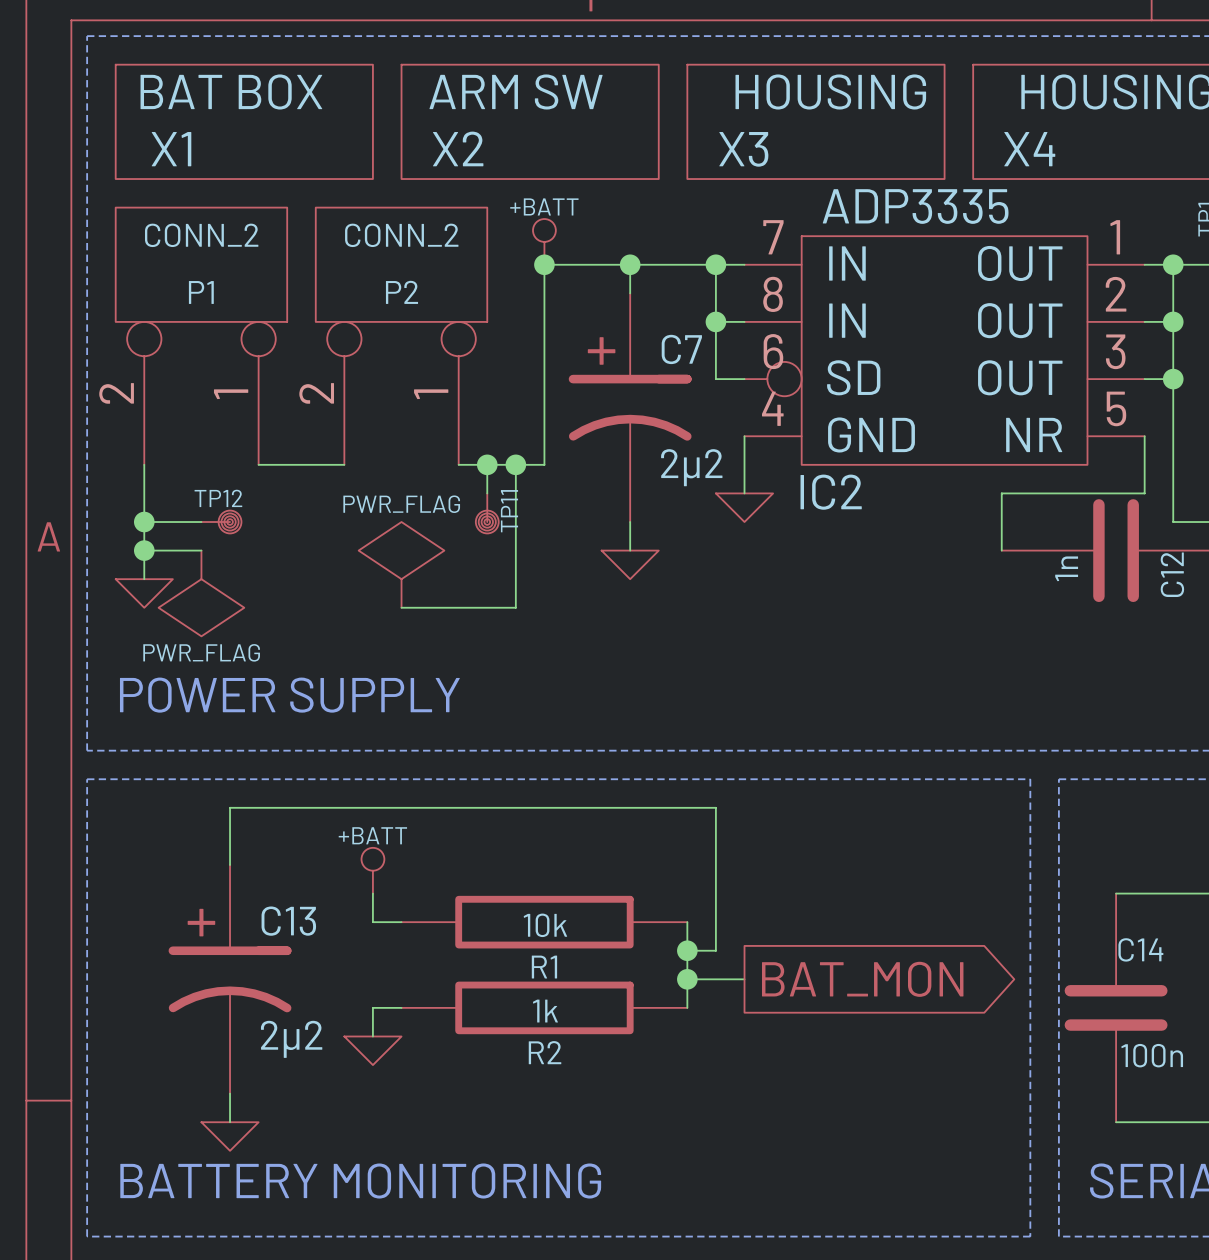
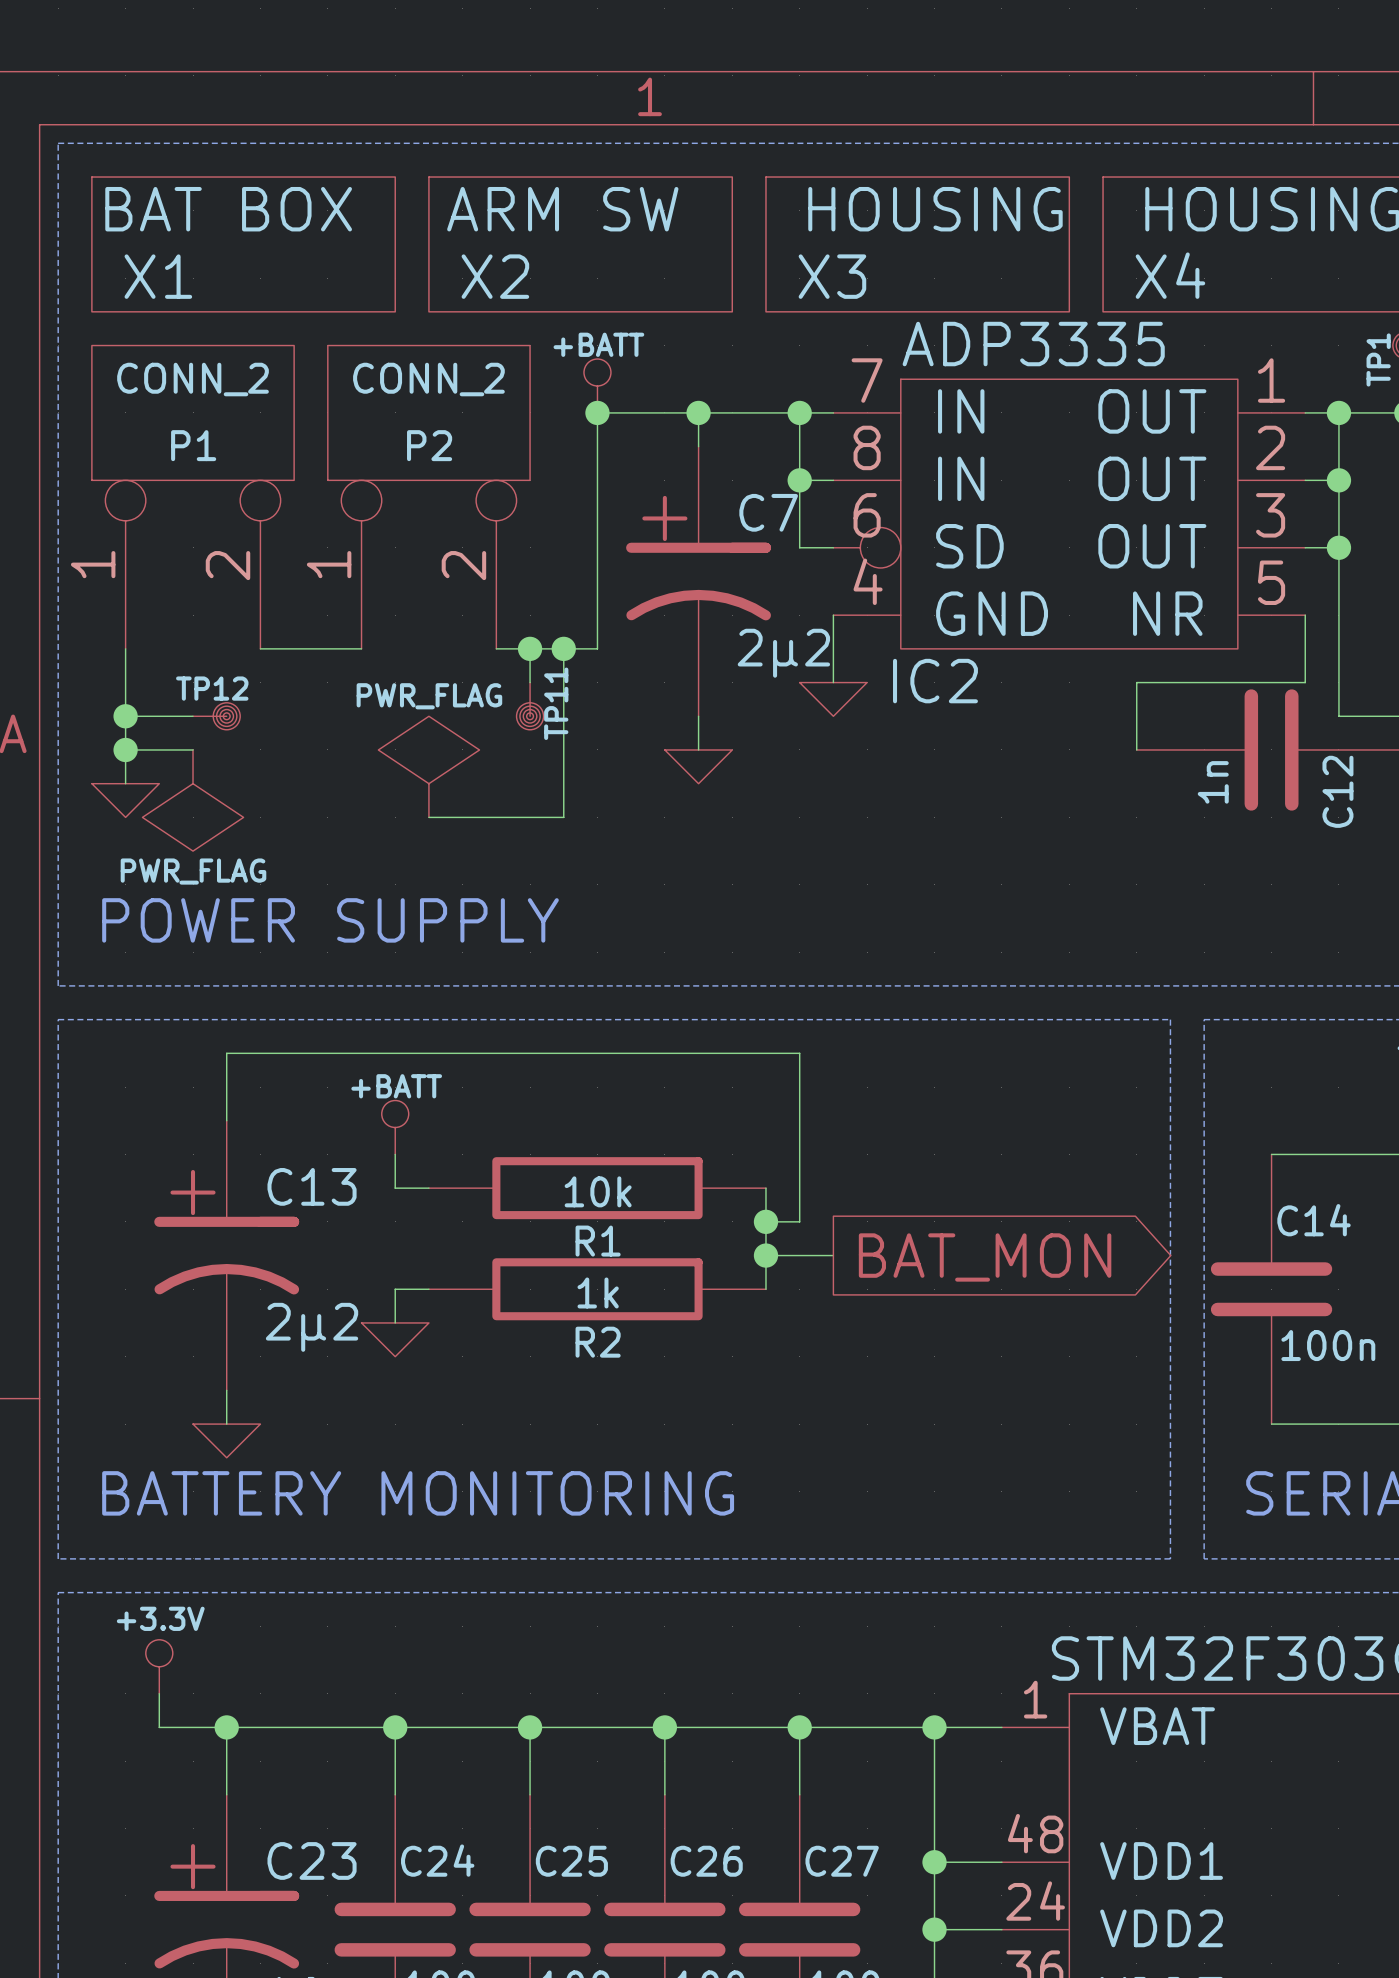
P1 flip: as is (201, 264) -> left-right (193, 412)
P2 flip: as is (401, 264) -> left-right (428, 412)

